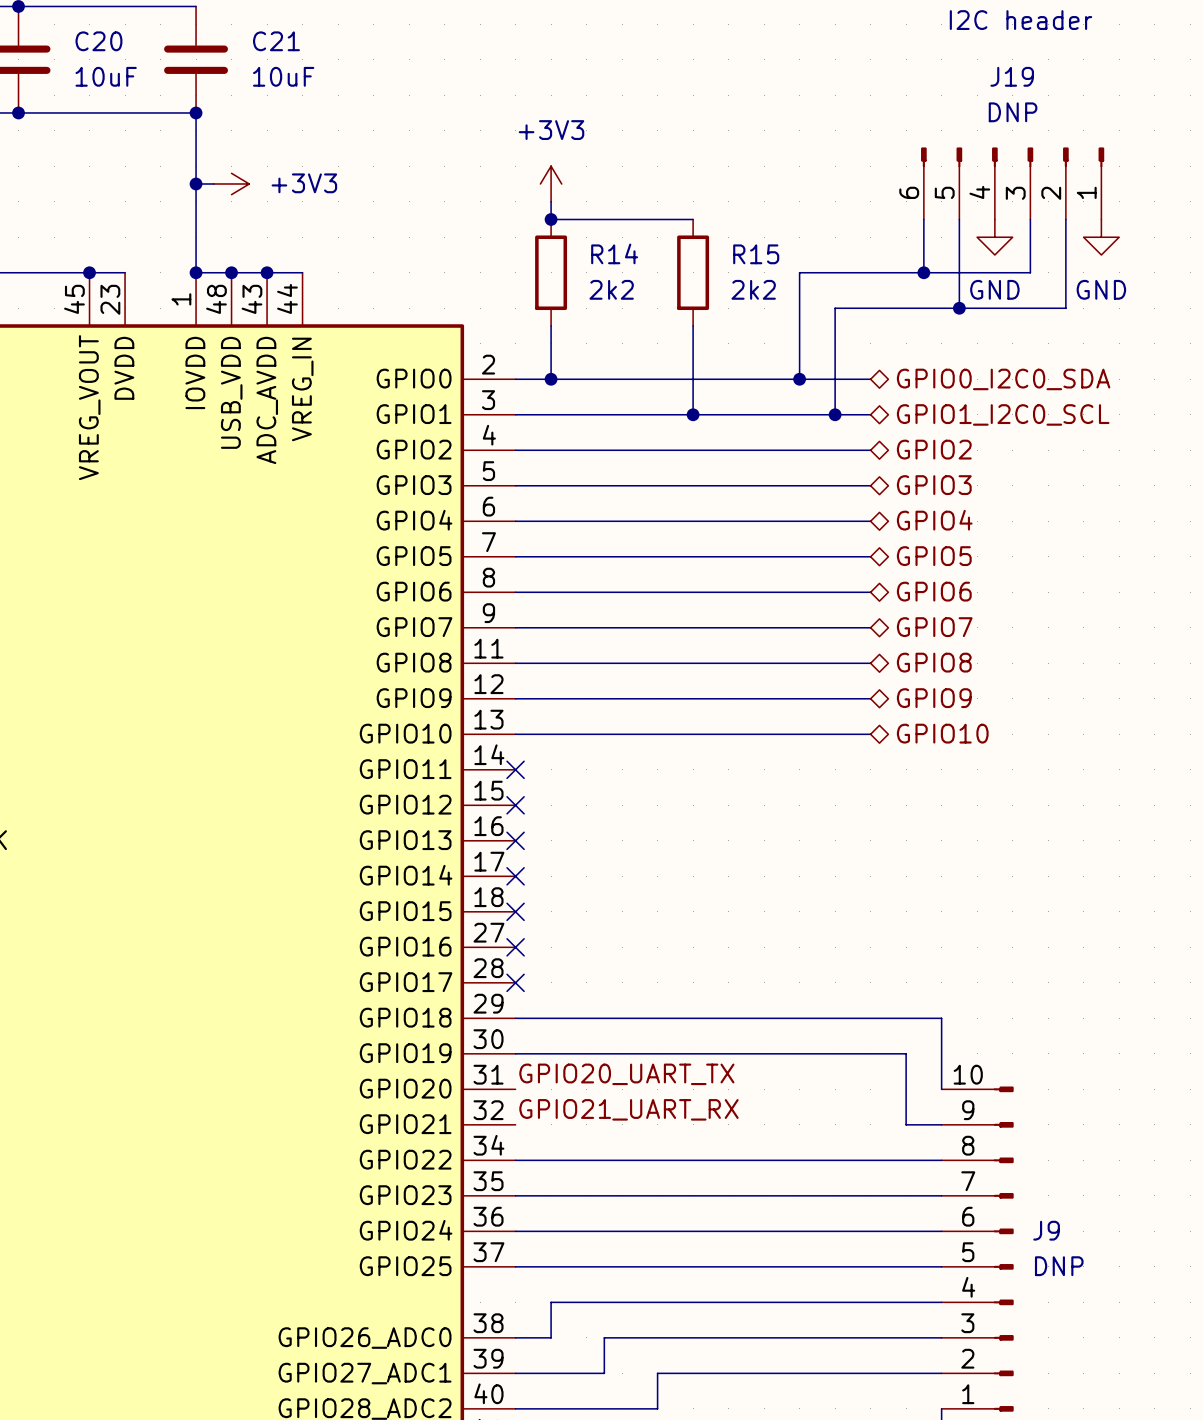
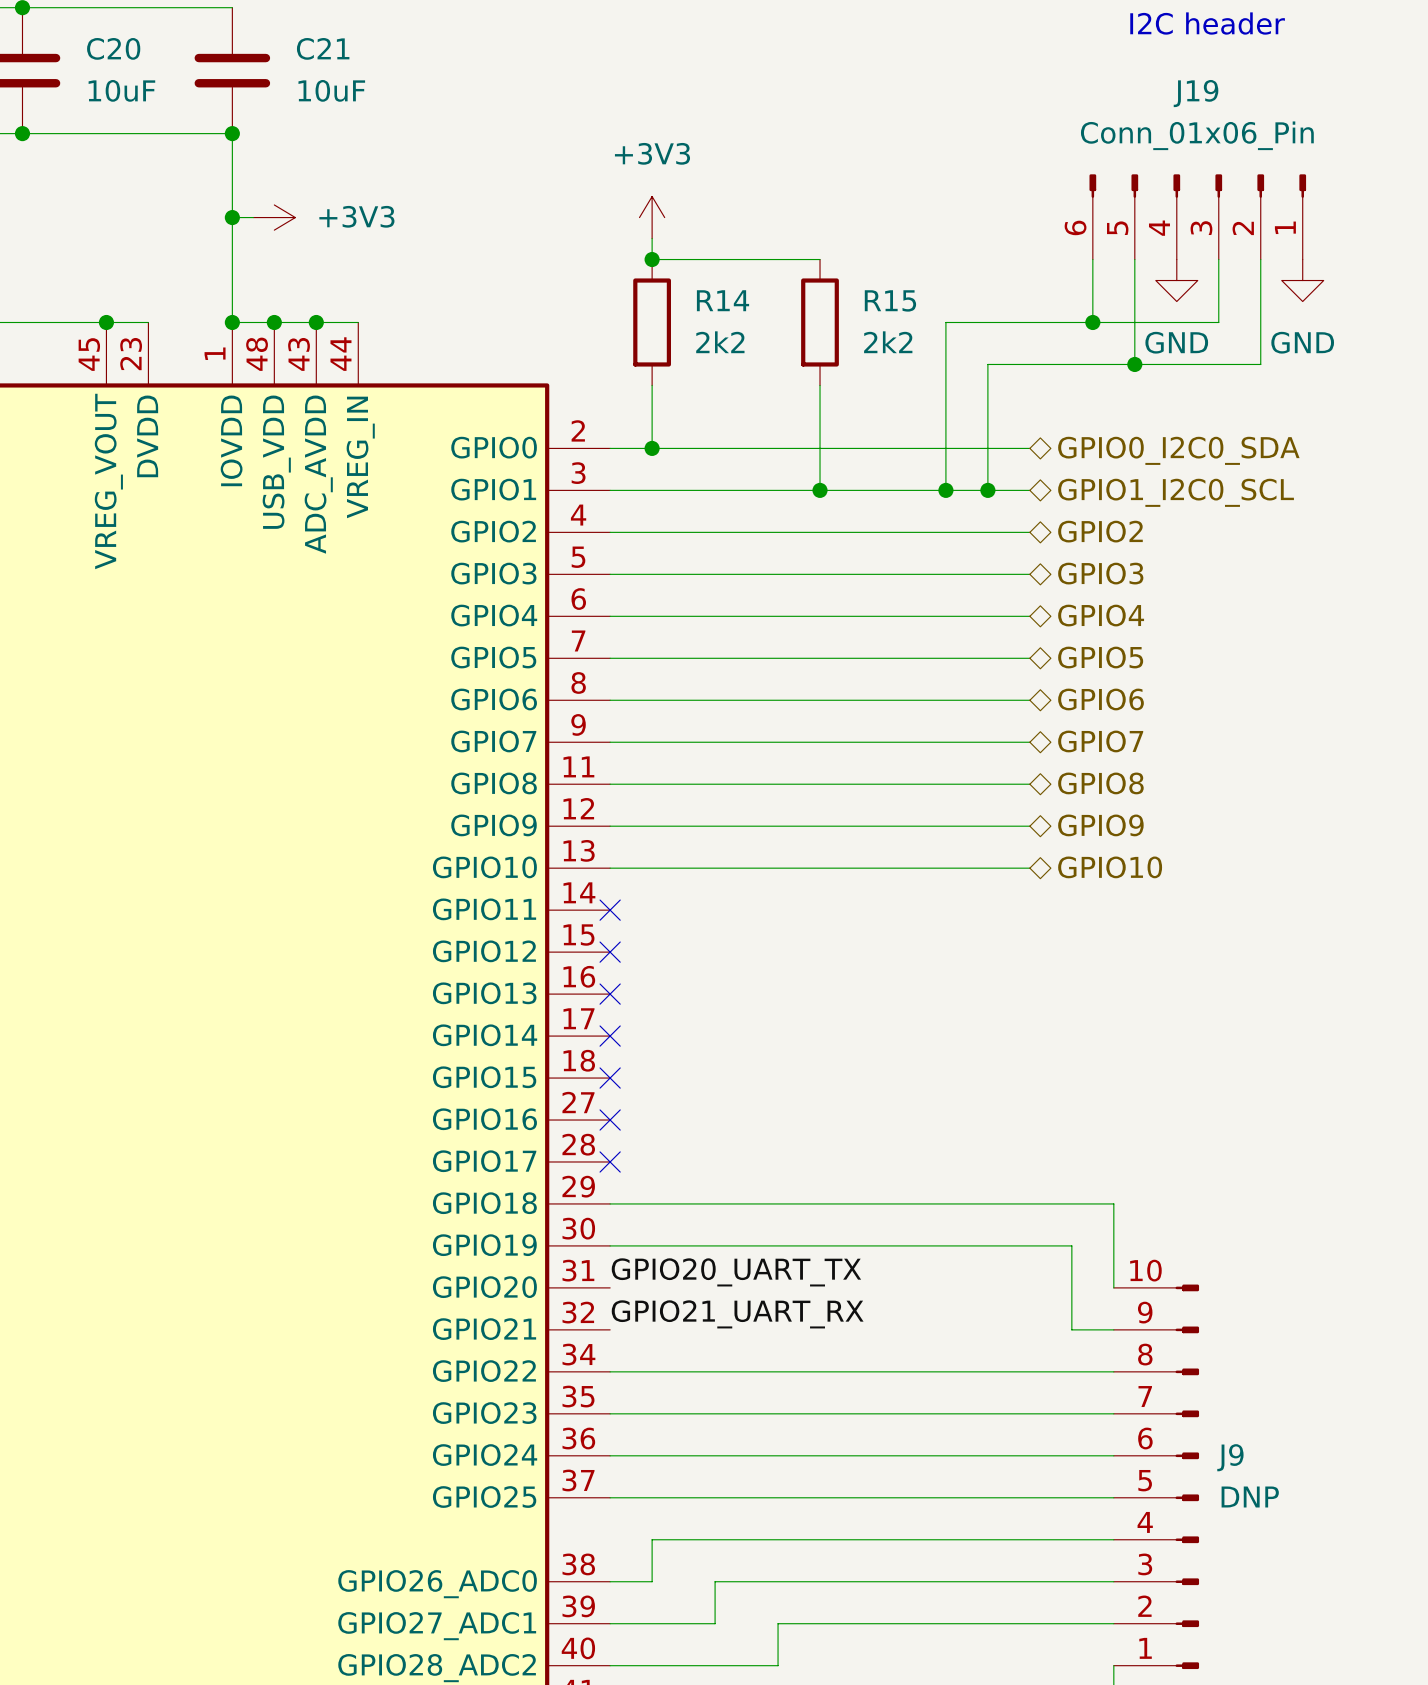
J19 value: DNP (1013, 112) -> Conn_01x06_Pin (1197, 135)
wire: none -> (945, 448) (945, 490)
junction position: (799, 379) -> (945, 490)

